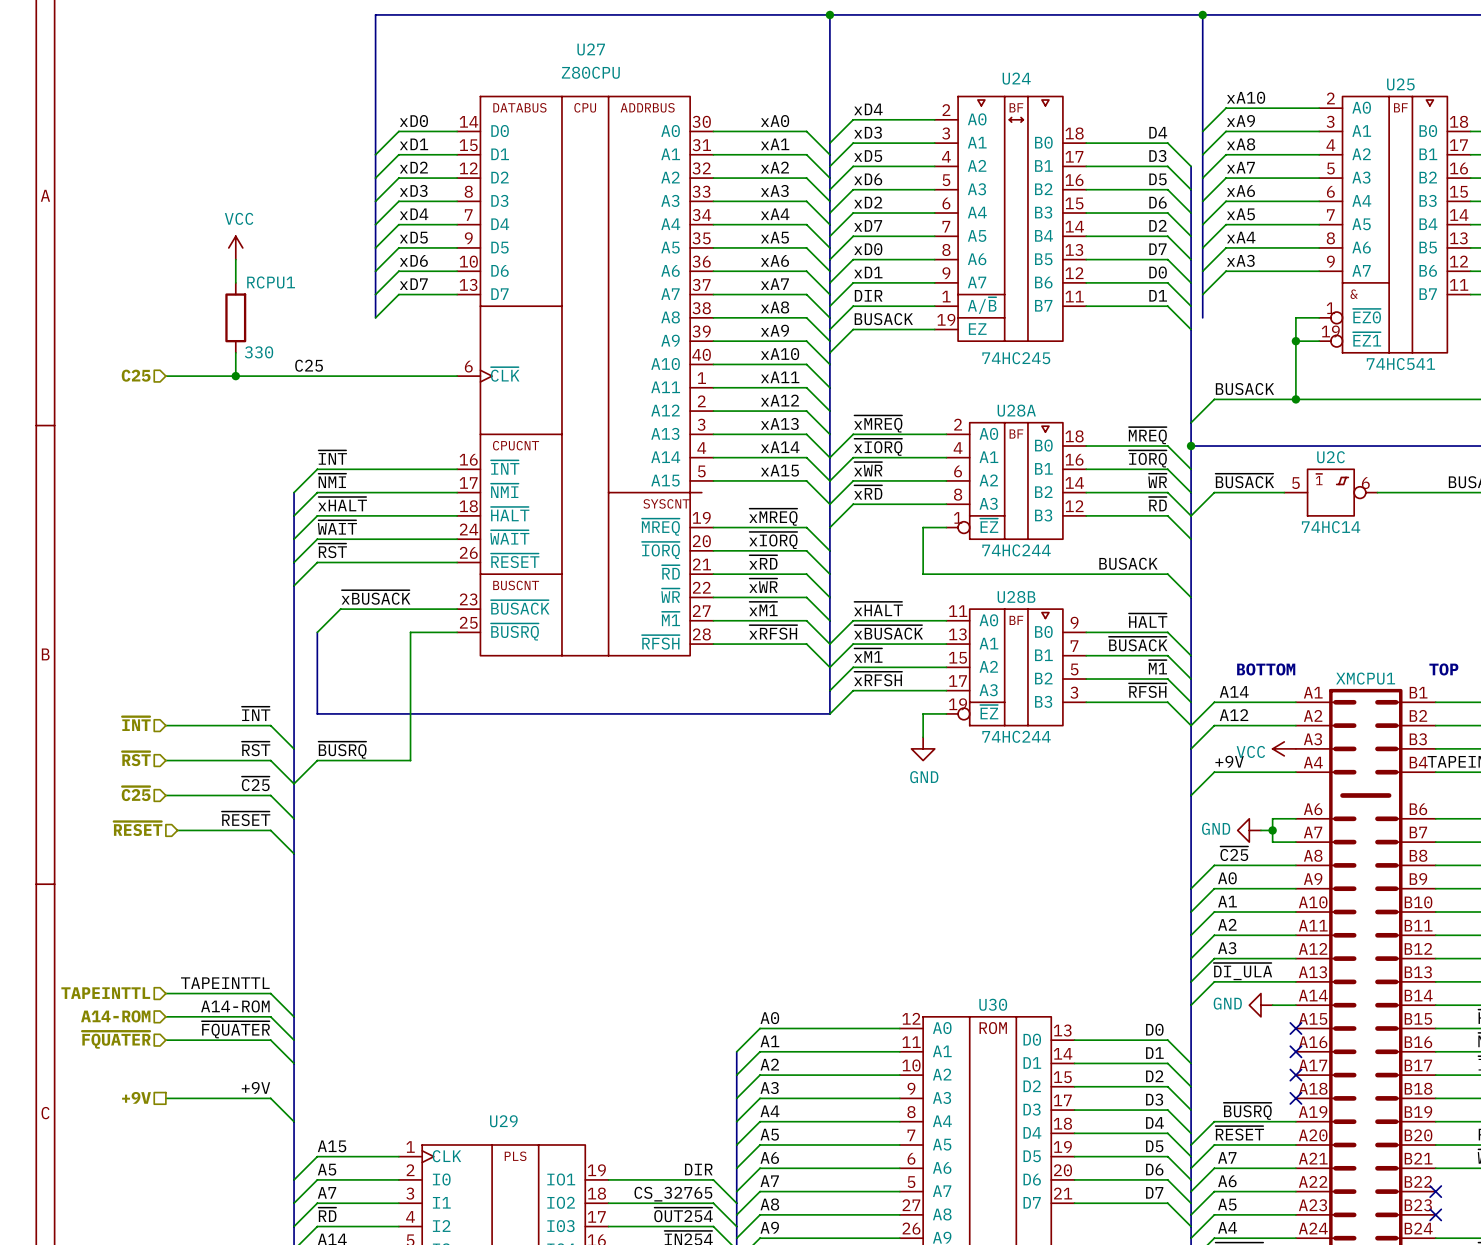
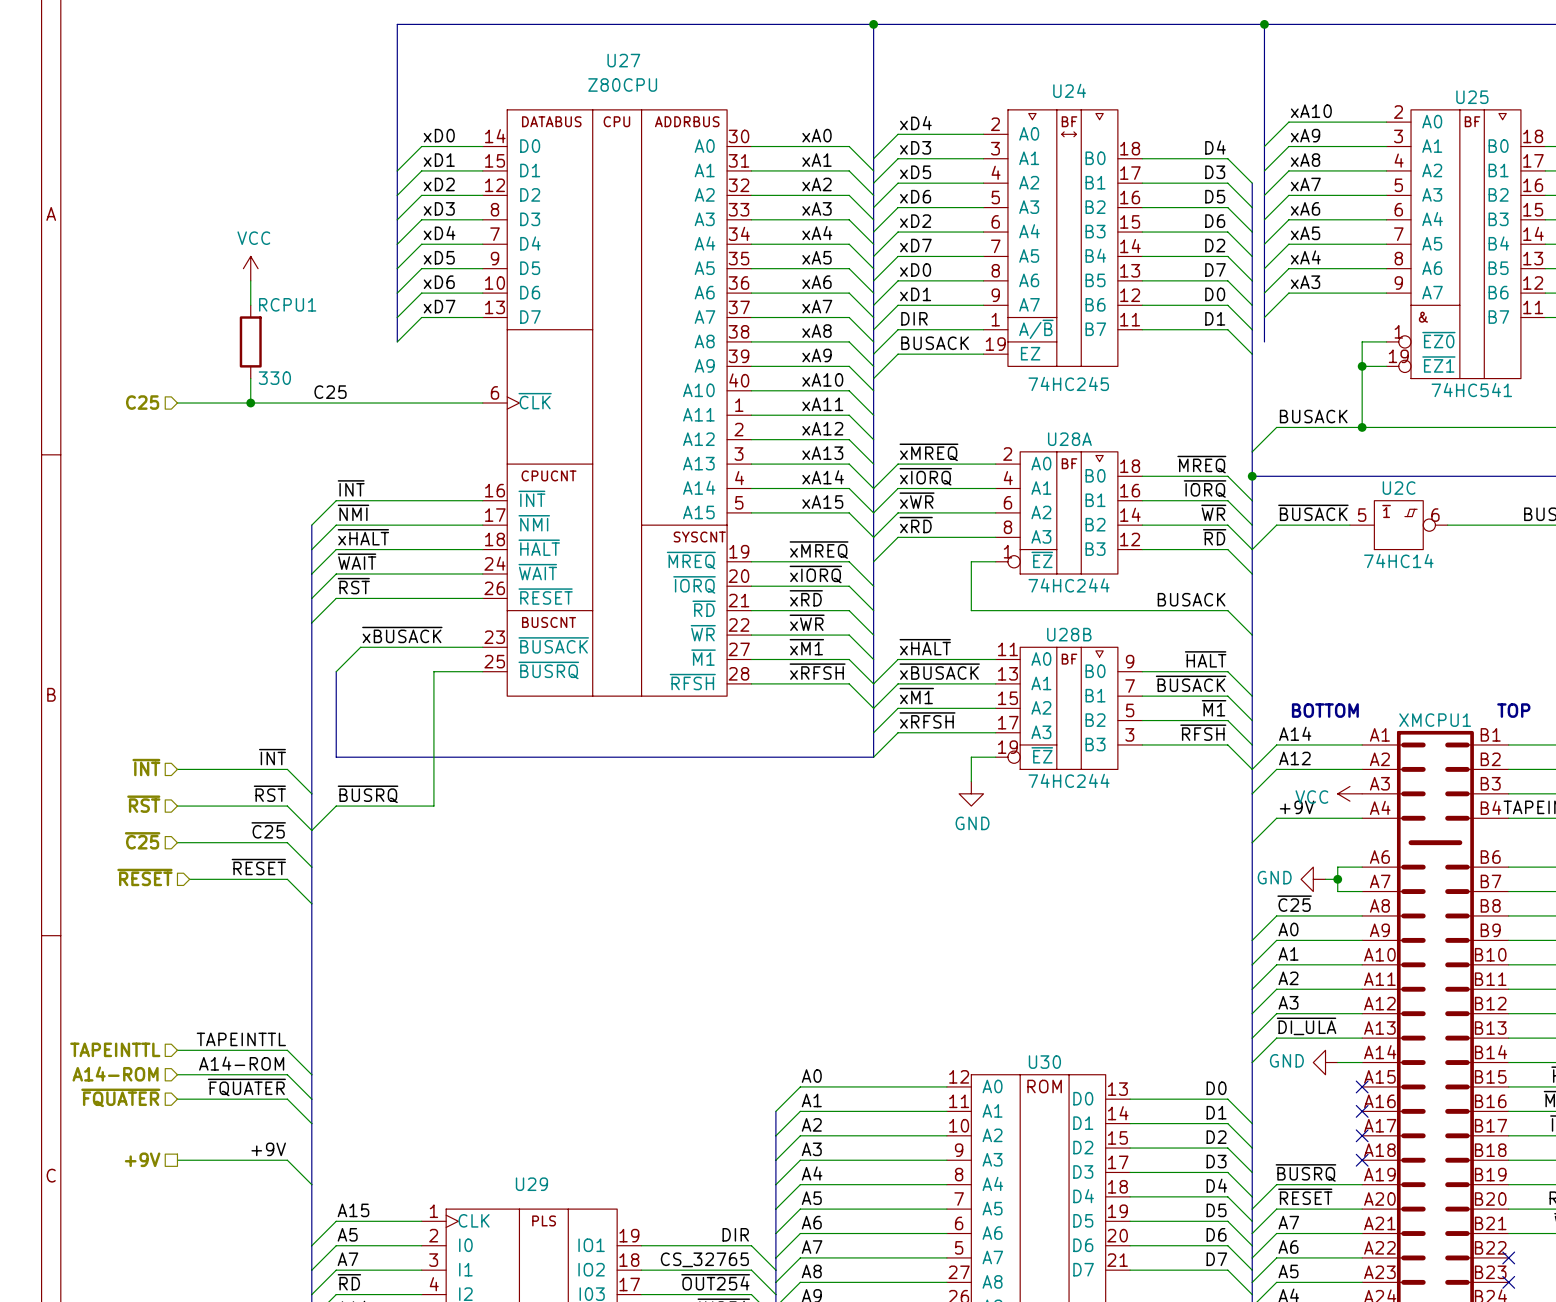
U27 symbol: [457, 96, 714, 656] -> [482, 109, 752, 697]

